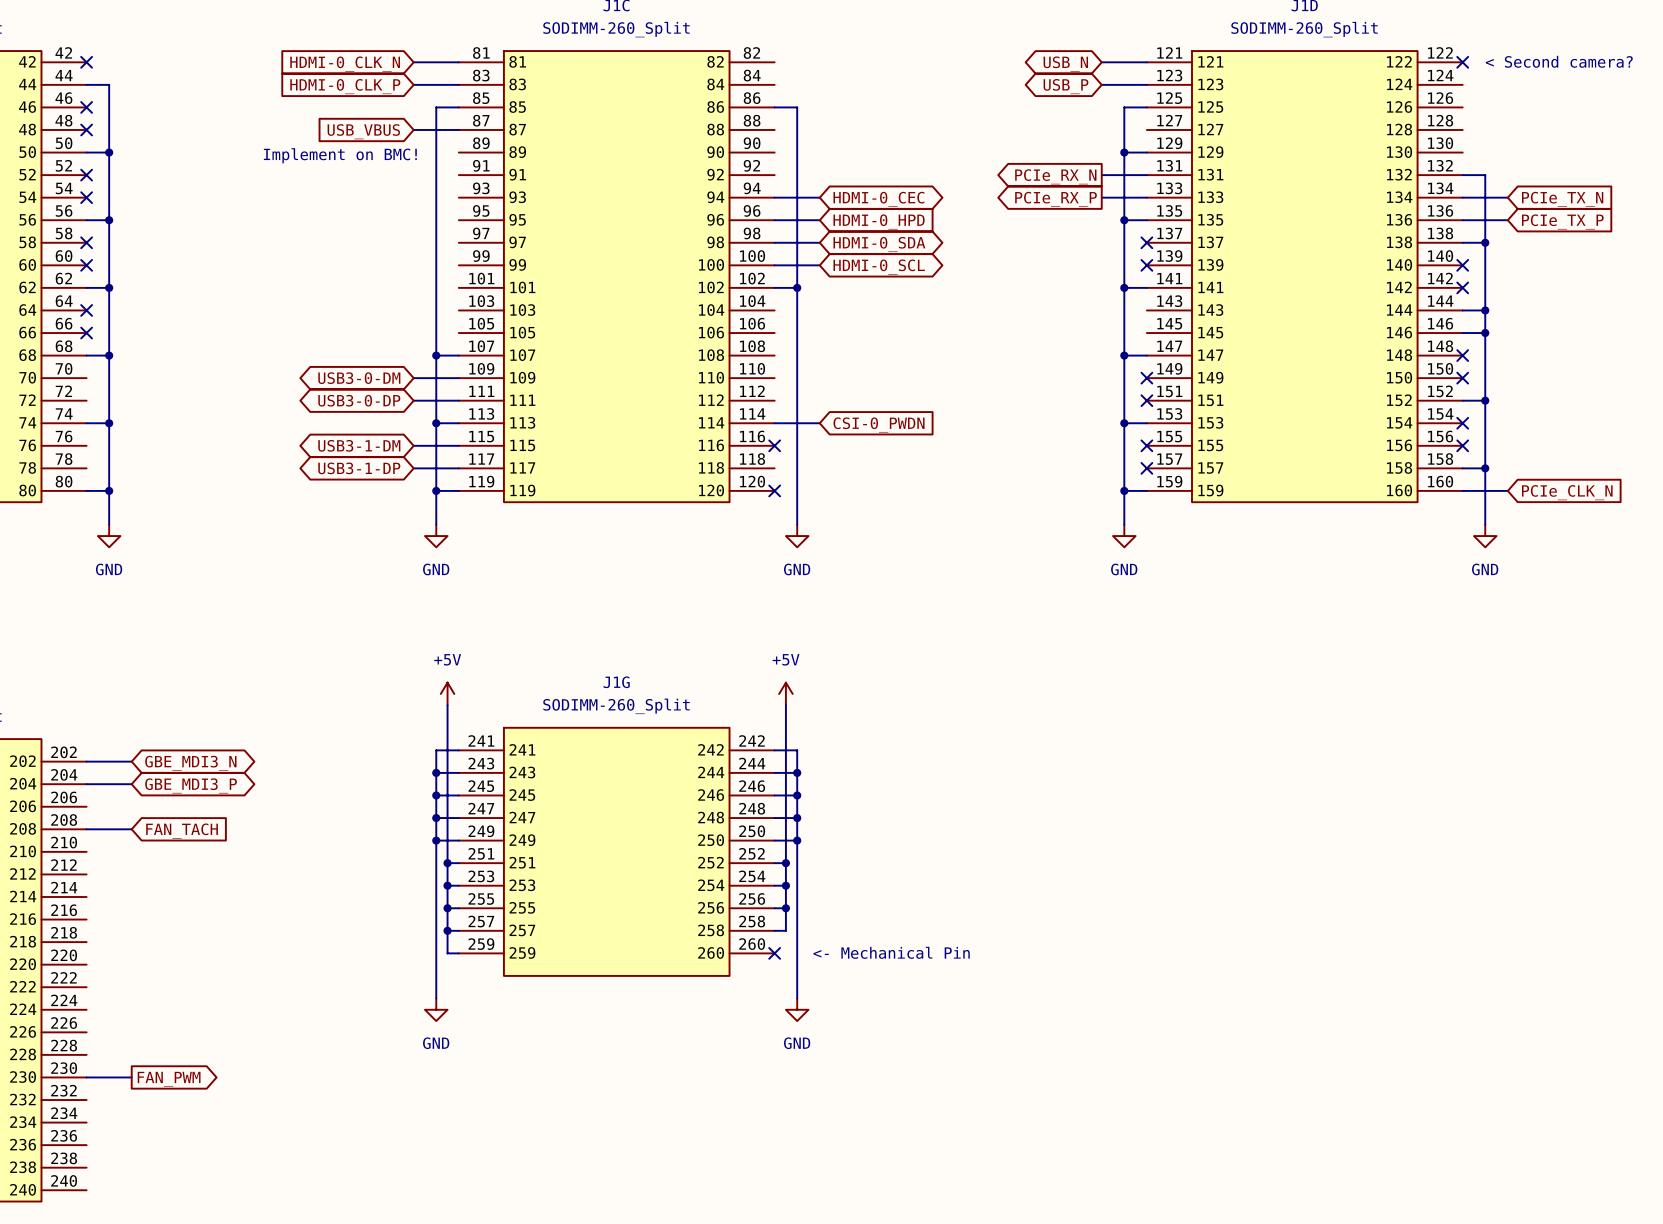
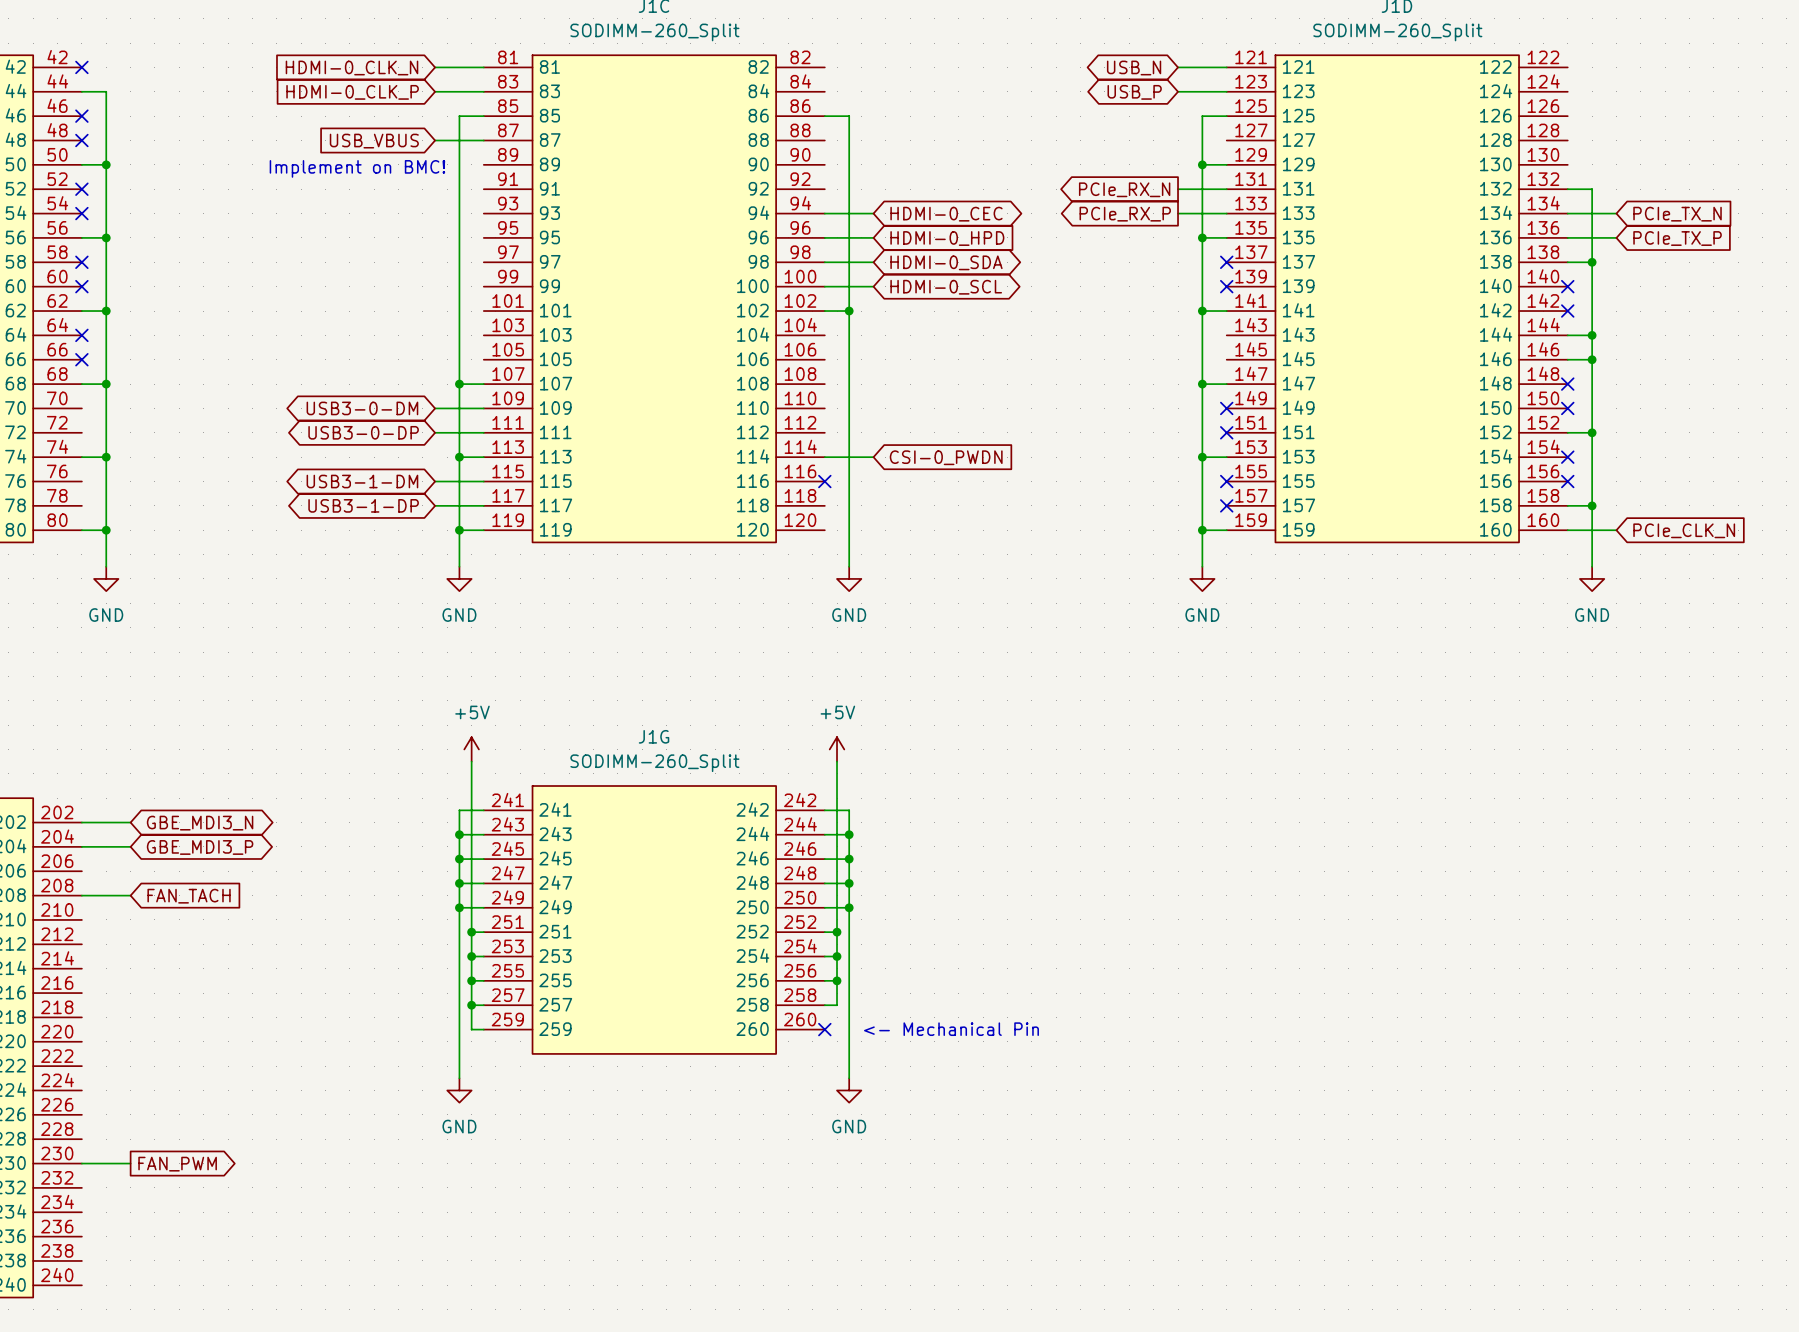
text: < Second camera? (1559, 61) -> none
no-connect mark: (1462, 62) -> none
no-connect mark: (774, 490) -> none

